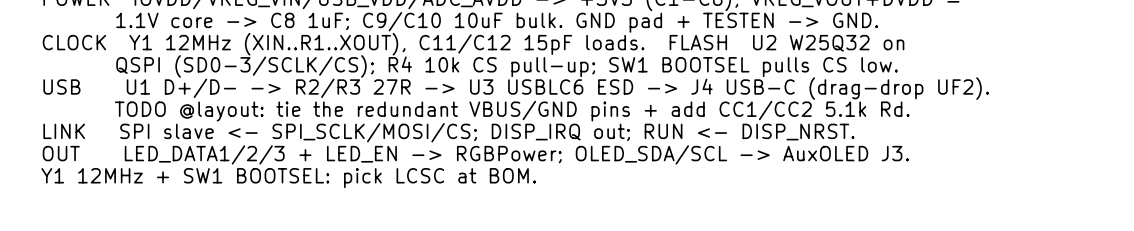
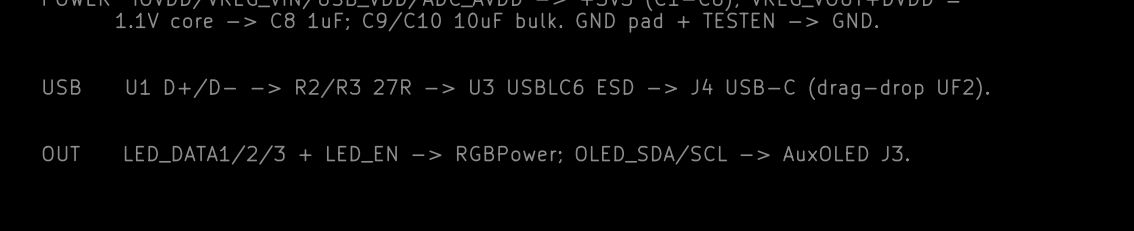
text: CLOCK Y1 12MHz (XIN..R1..XOUT), C11/C12 15pF loads. FLASH U2 W25Q32 on (473, 44) -> none
text: QSPI (SD0-3/SCLK/CS); R4 10k CS pull-up; SW1 BOOTSEL pulls CS low. (507, 66) -> none
text: TODO @layout: tie the redundant VBUS/GND pins + add CC1/CC2 5.1k Rd. (512, 111) -> none
text: LINK SPI slave <- SPI_SCLK/MOSI/CS; DISP_IRQ out; RUN <- DISP_NRST. (448, 132) -> none
text: Y1 12MHz + SW1 BOOTSEL: pick LCSC at BOM. (288, 178) -> none

